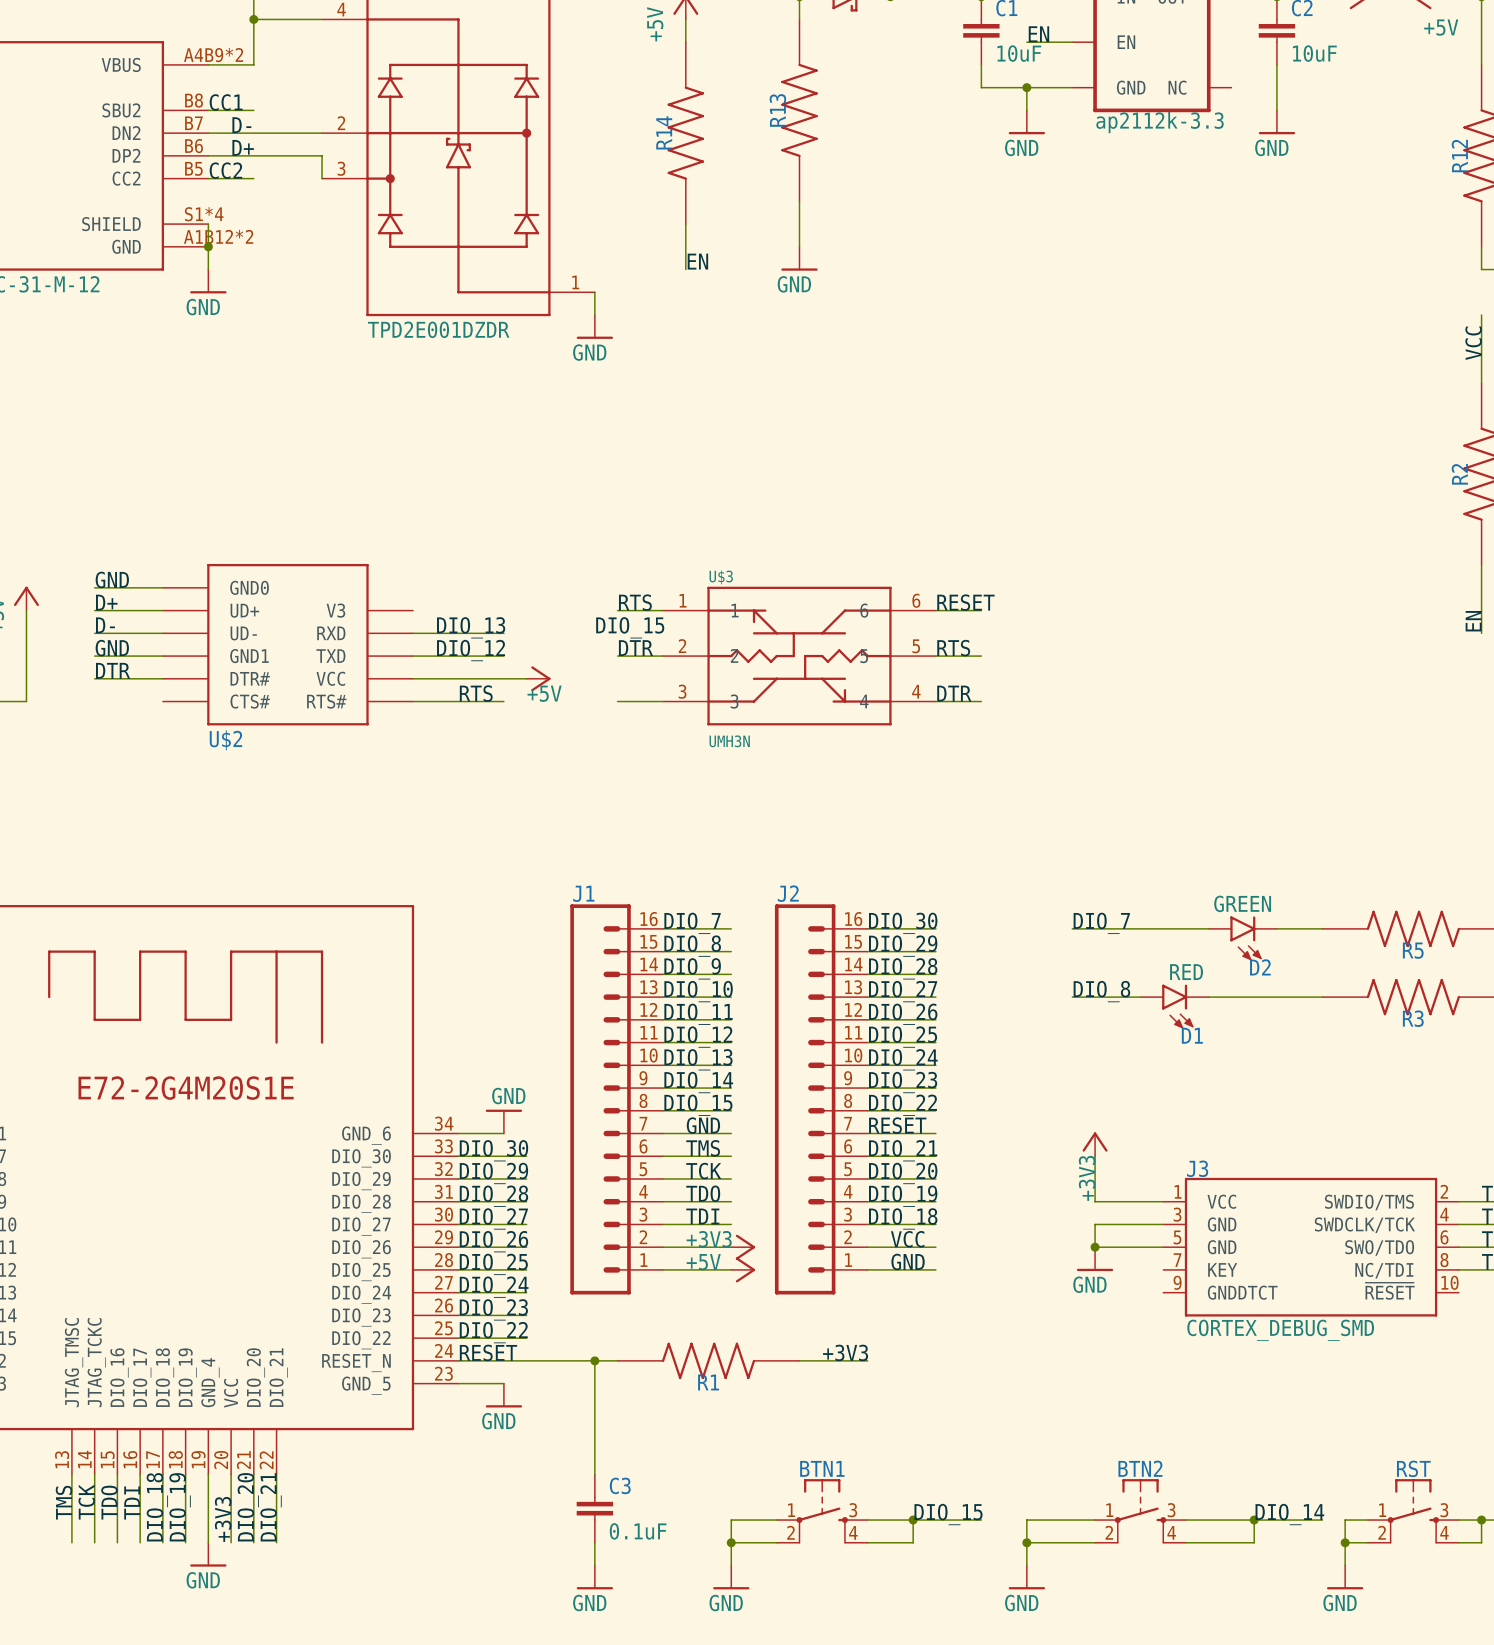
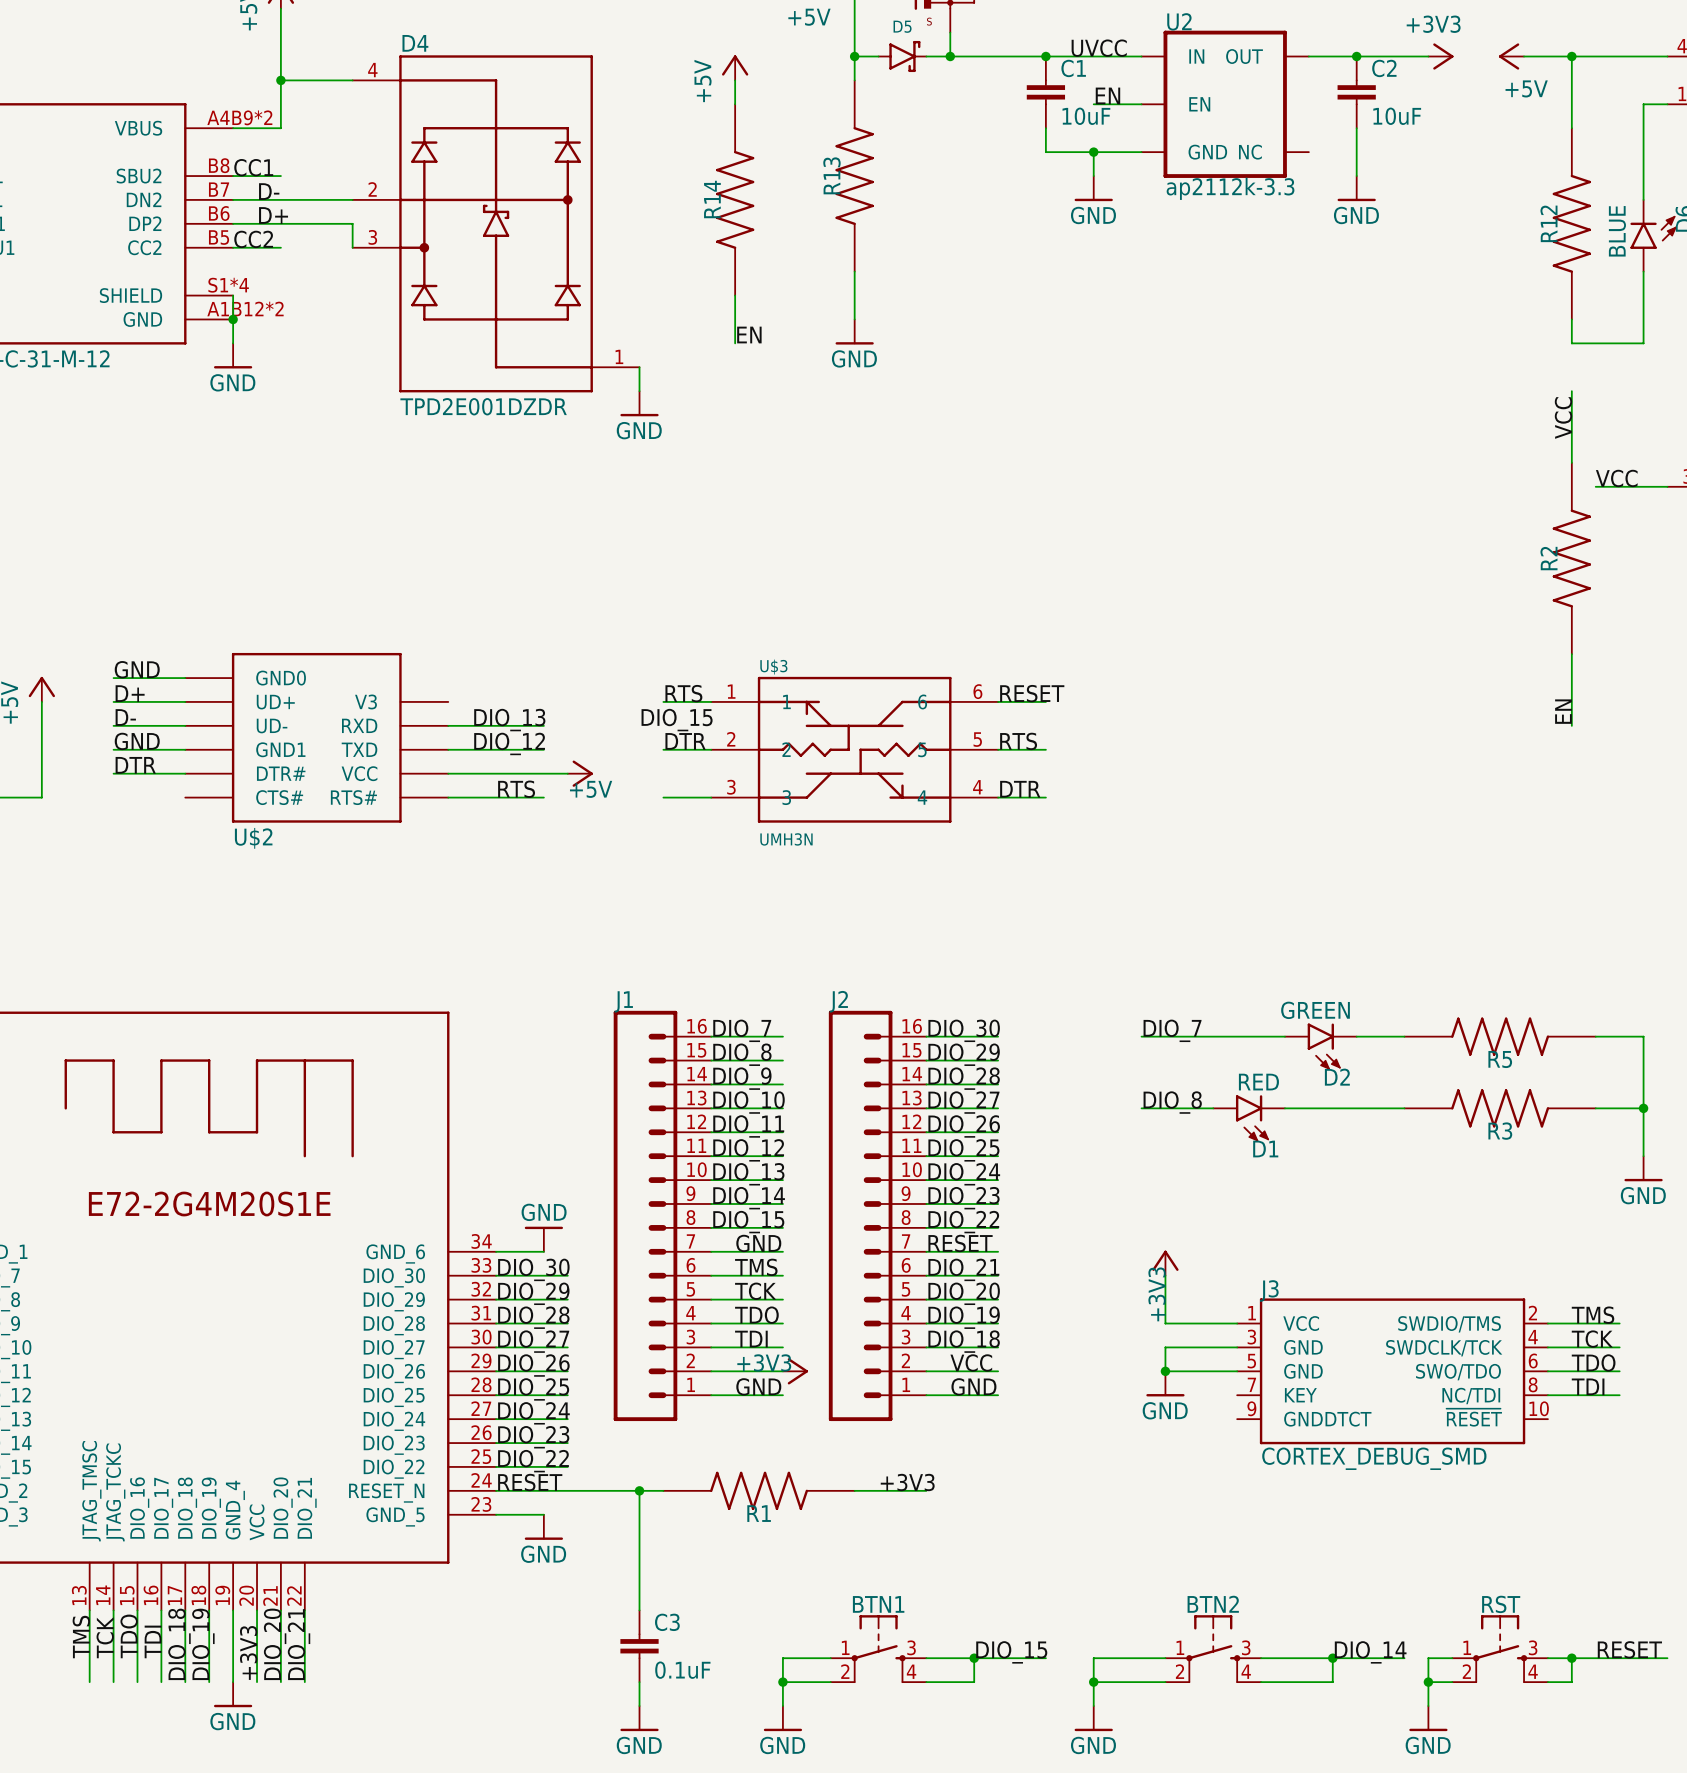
label: none -> GND (758, 1386)
power symbol: +5V (743, 1269) -> none

